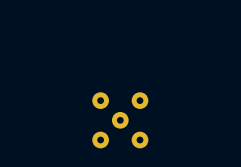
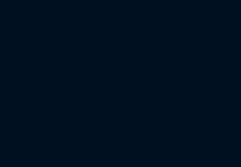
part: (120, 120) -> none

